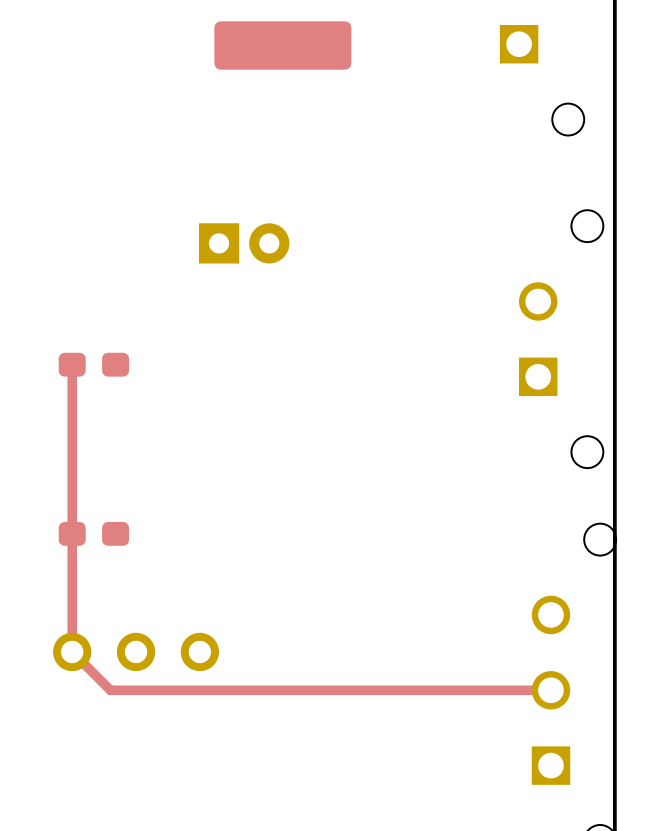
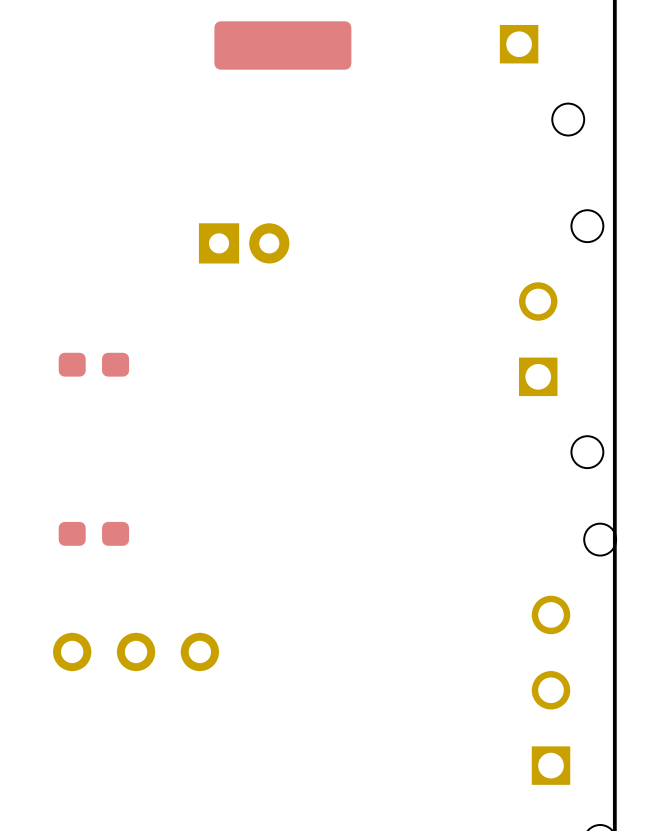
top track: (72, 364) (72, 651) (110, 690) (551, 690) -> none

